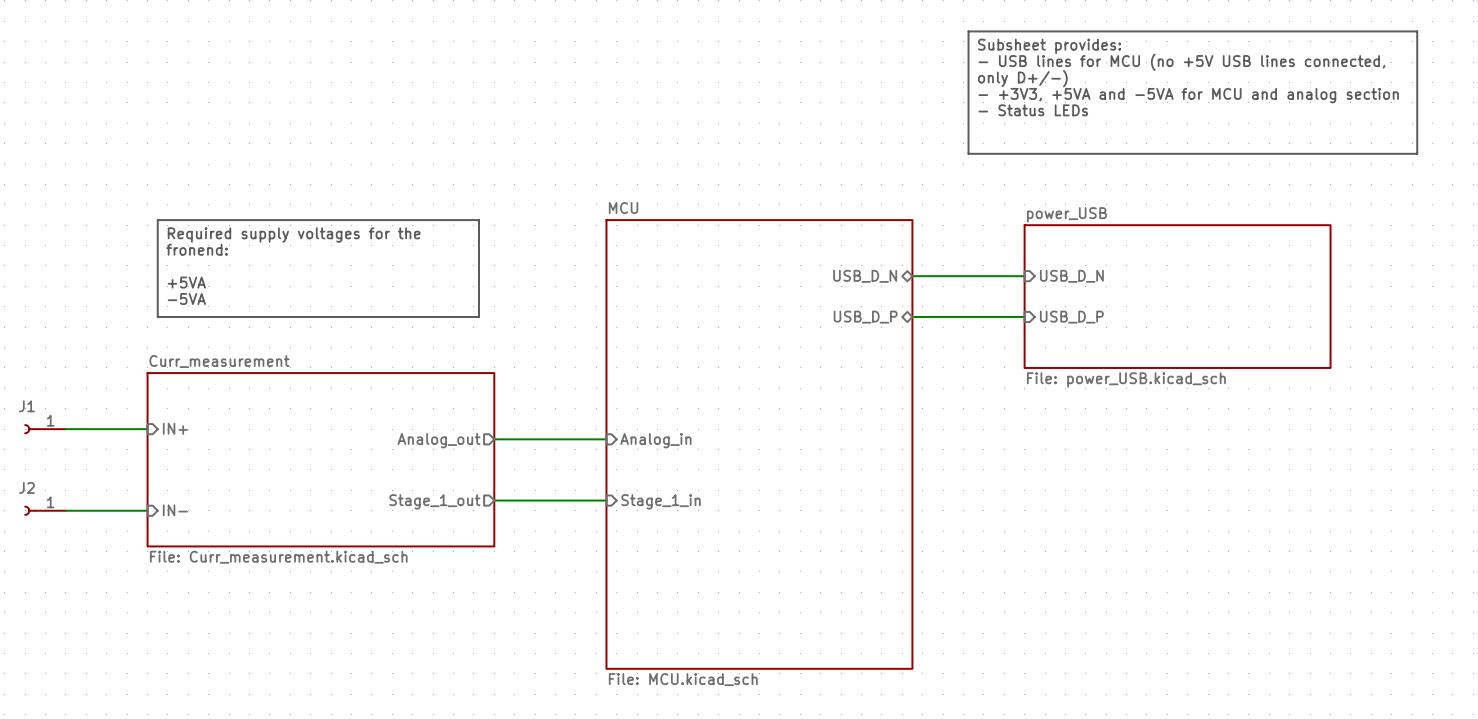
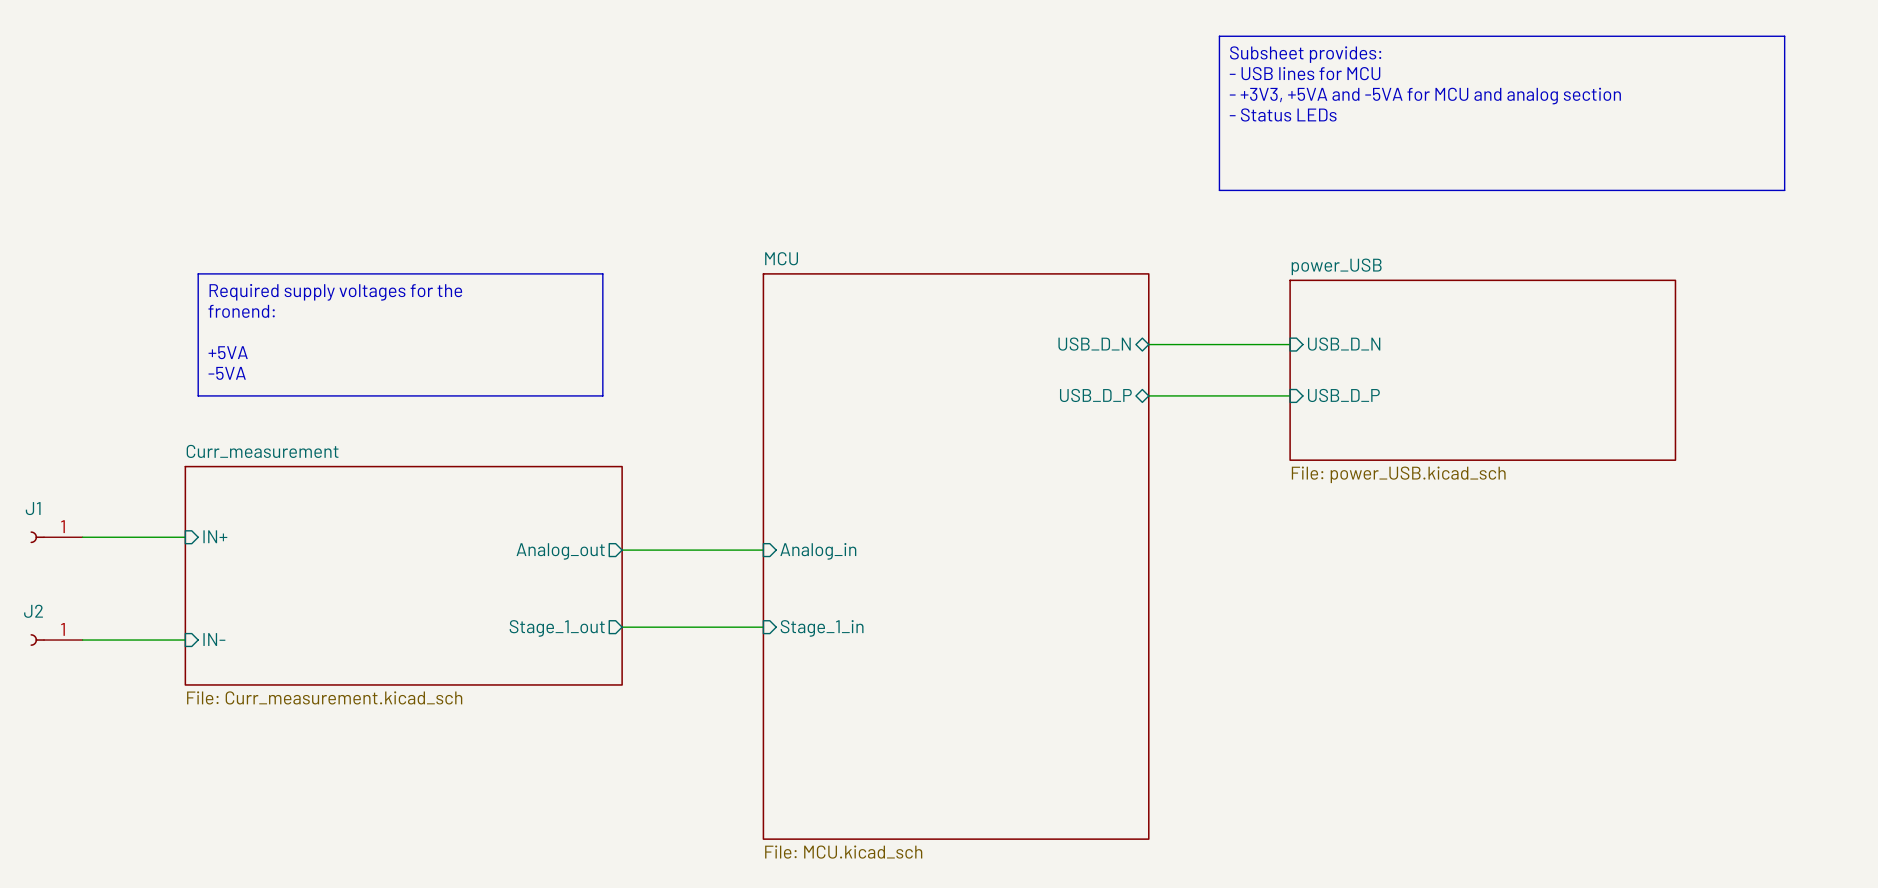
text: - USB lines for MCU (no +5V USB lines connected, (1181, 62) -> - USB lines for MCU (1305, 73)
text: only D+/-) (1022, 78) -> - +3V3, +5VA and -5VA for MCU and analog section (1425, 96)
text: - +3V3, +5VA and -5VA for MCU and analog section (1188, 95) -> - Status LEDs (1283, 114)
text: - Status LEDs (1033, 110) -> none

